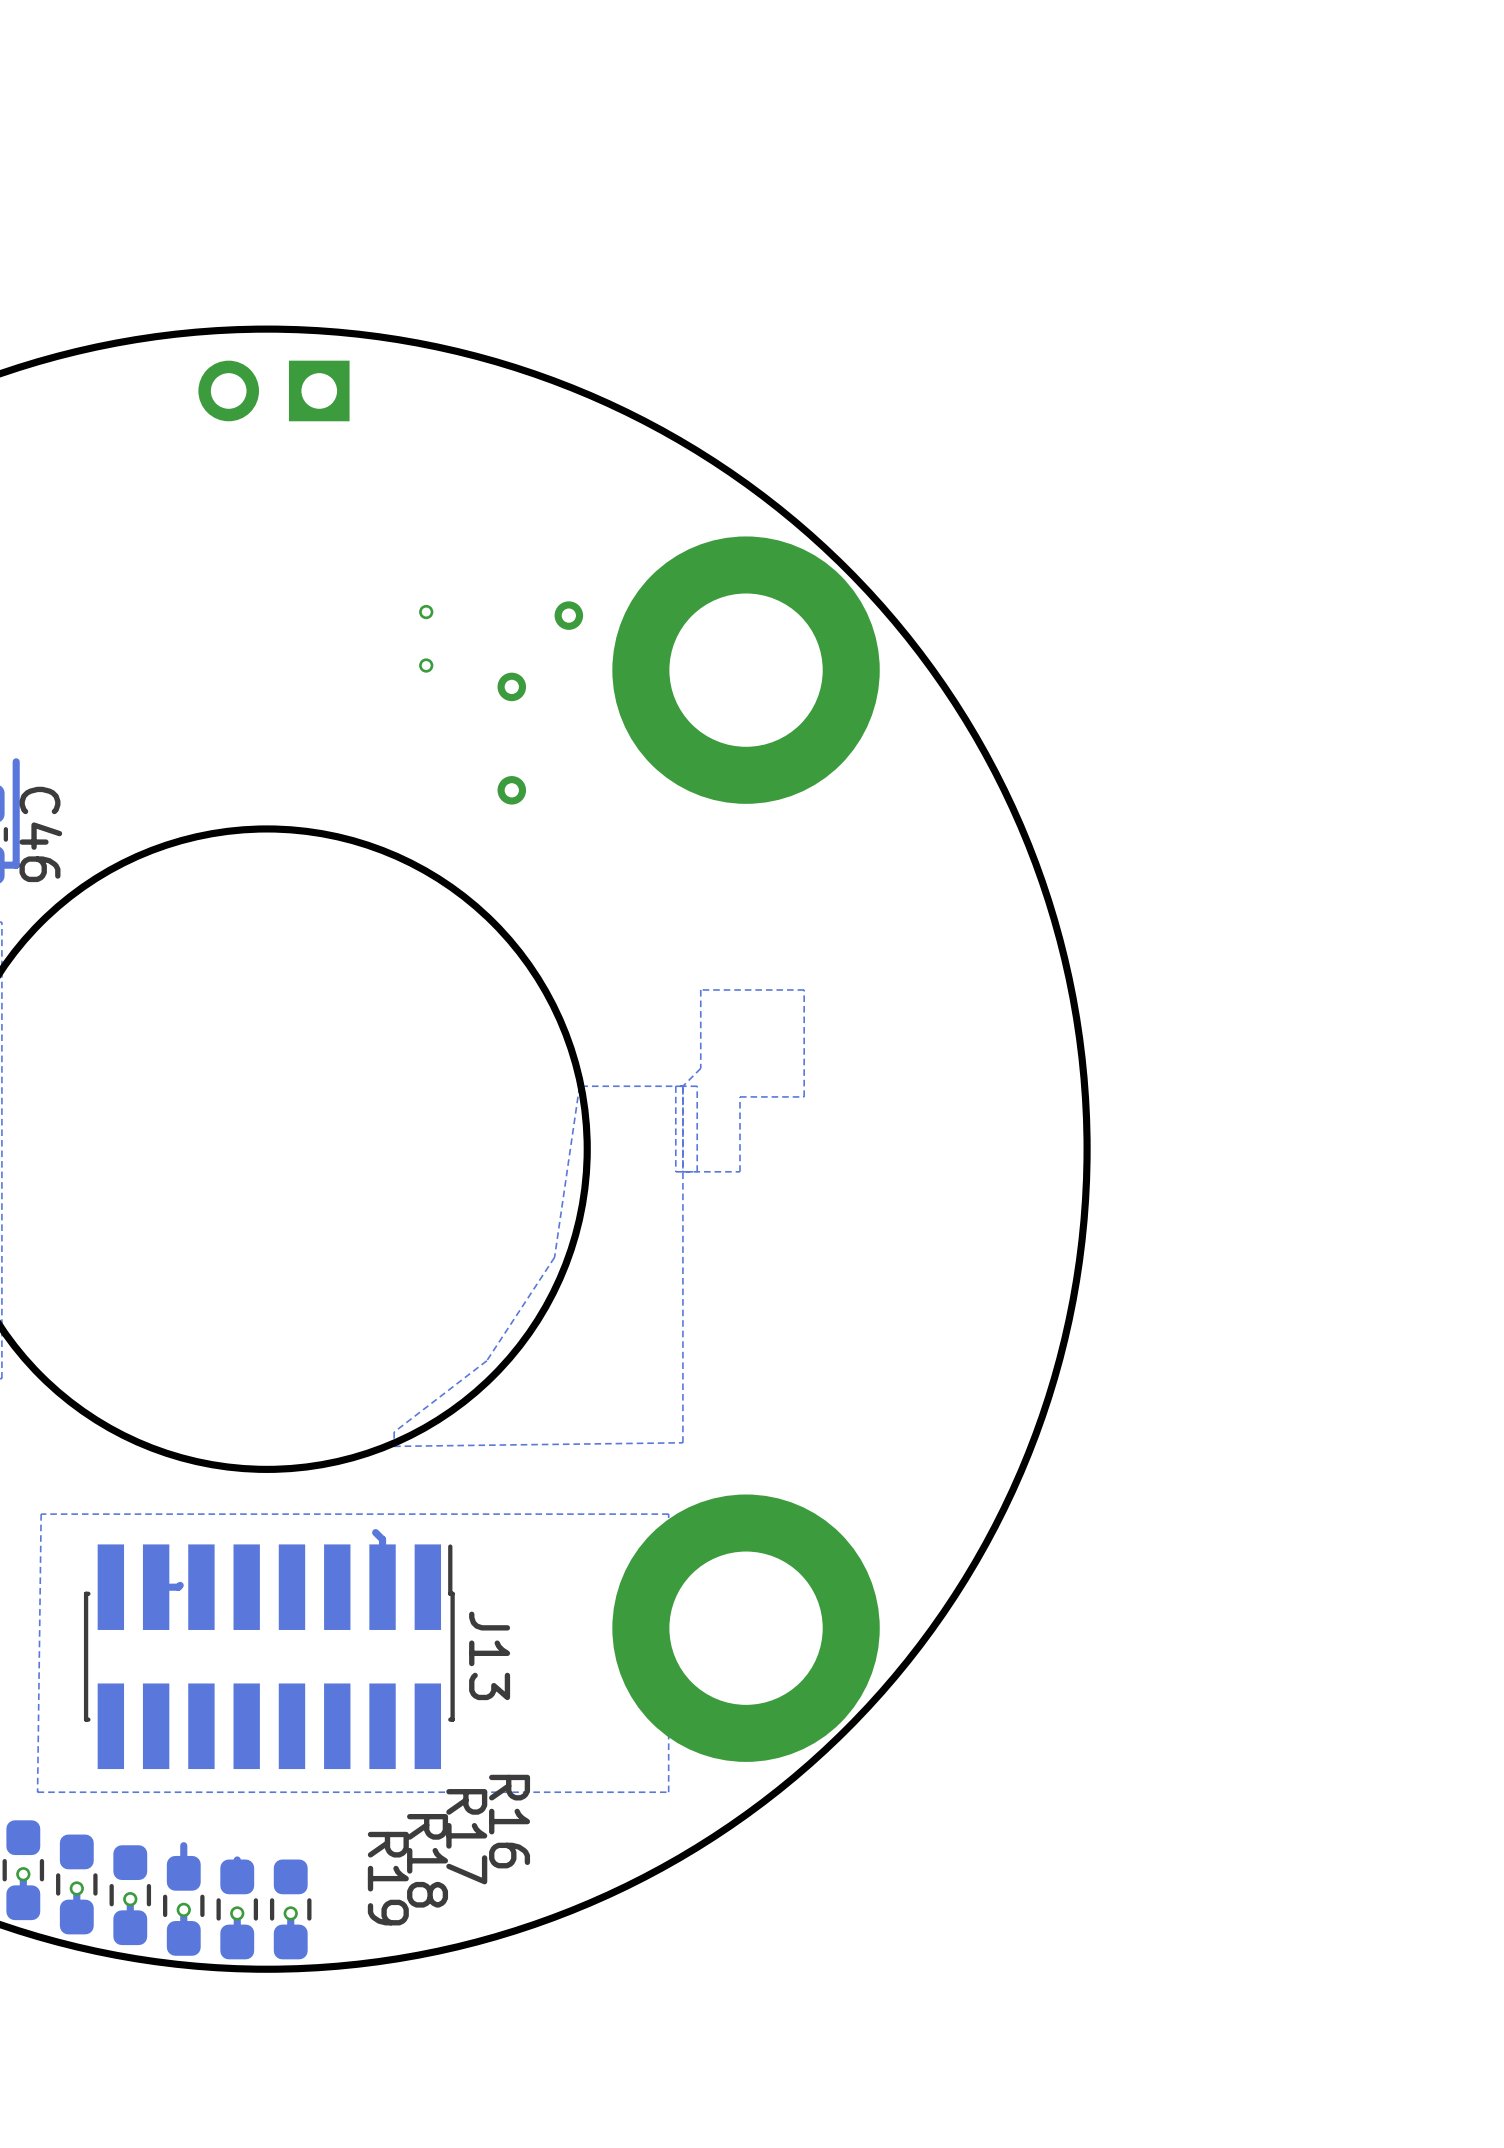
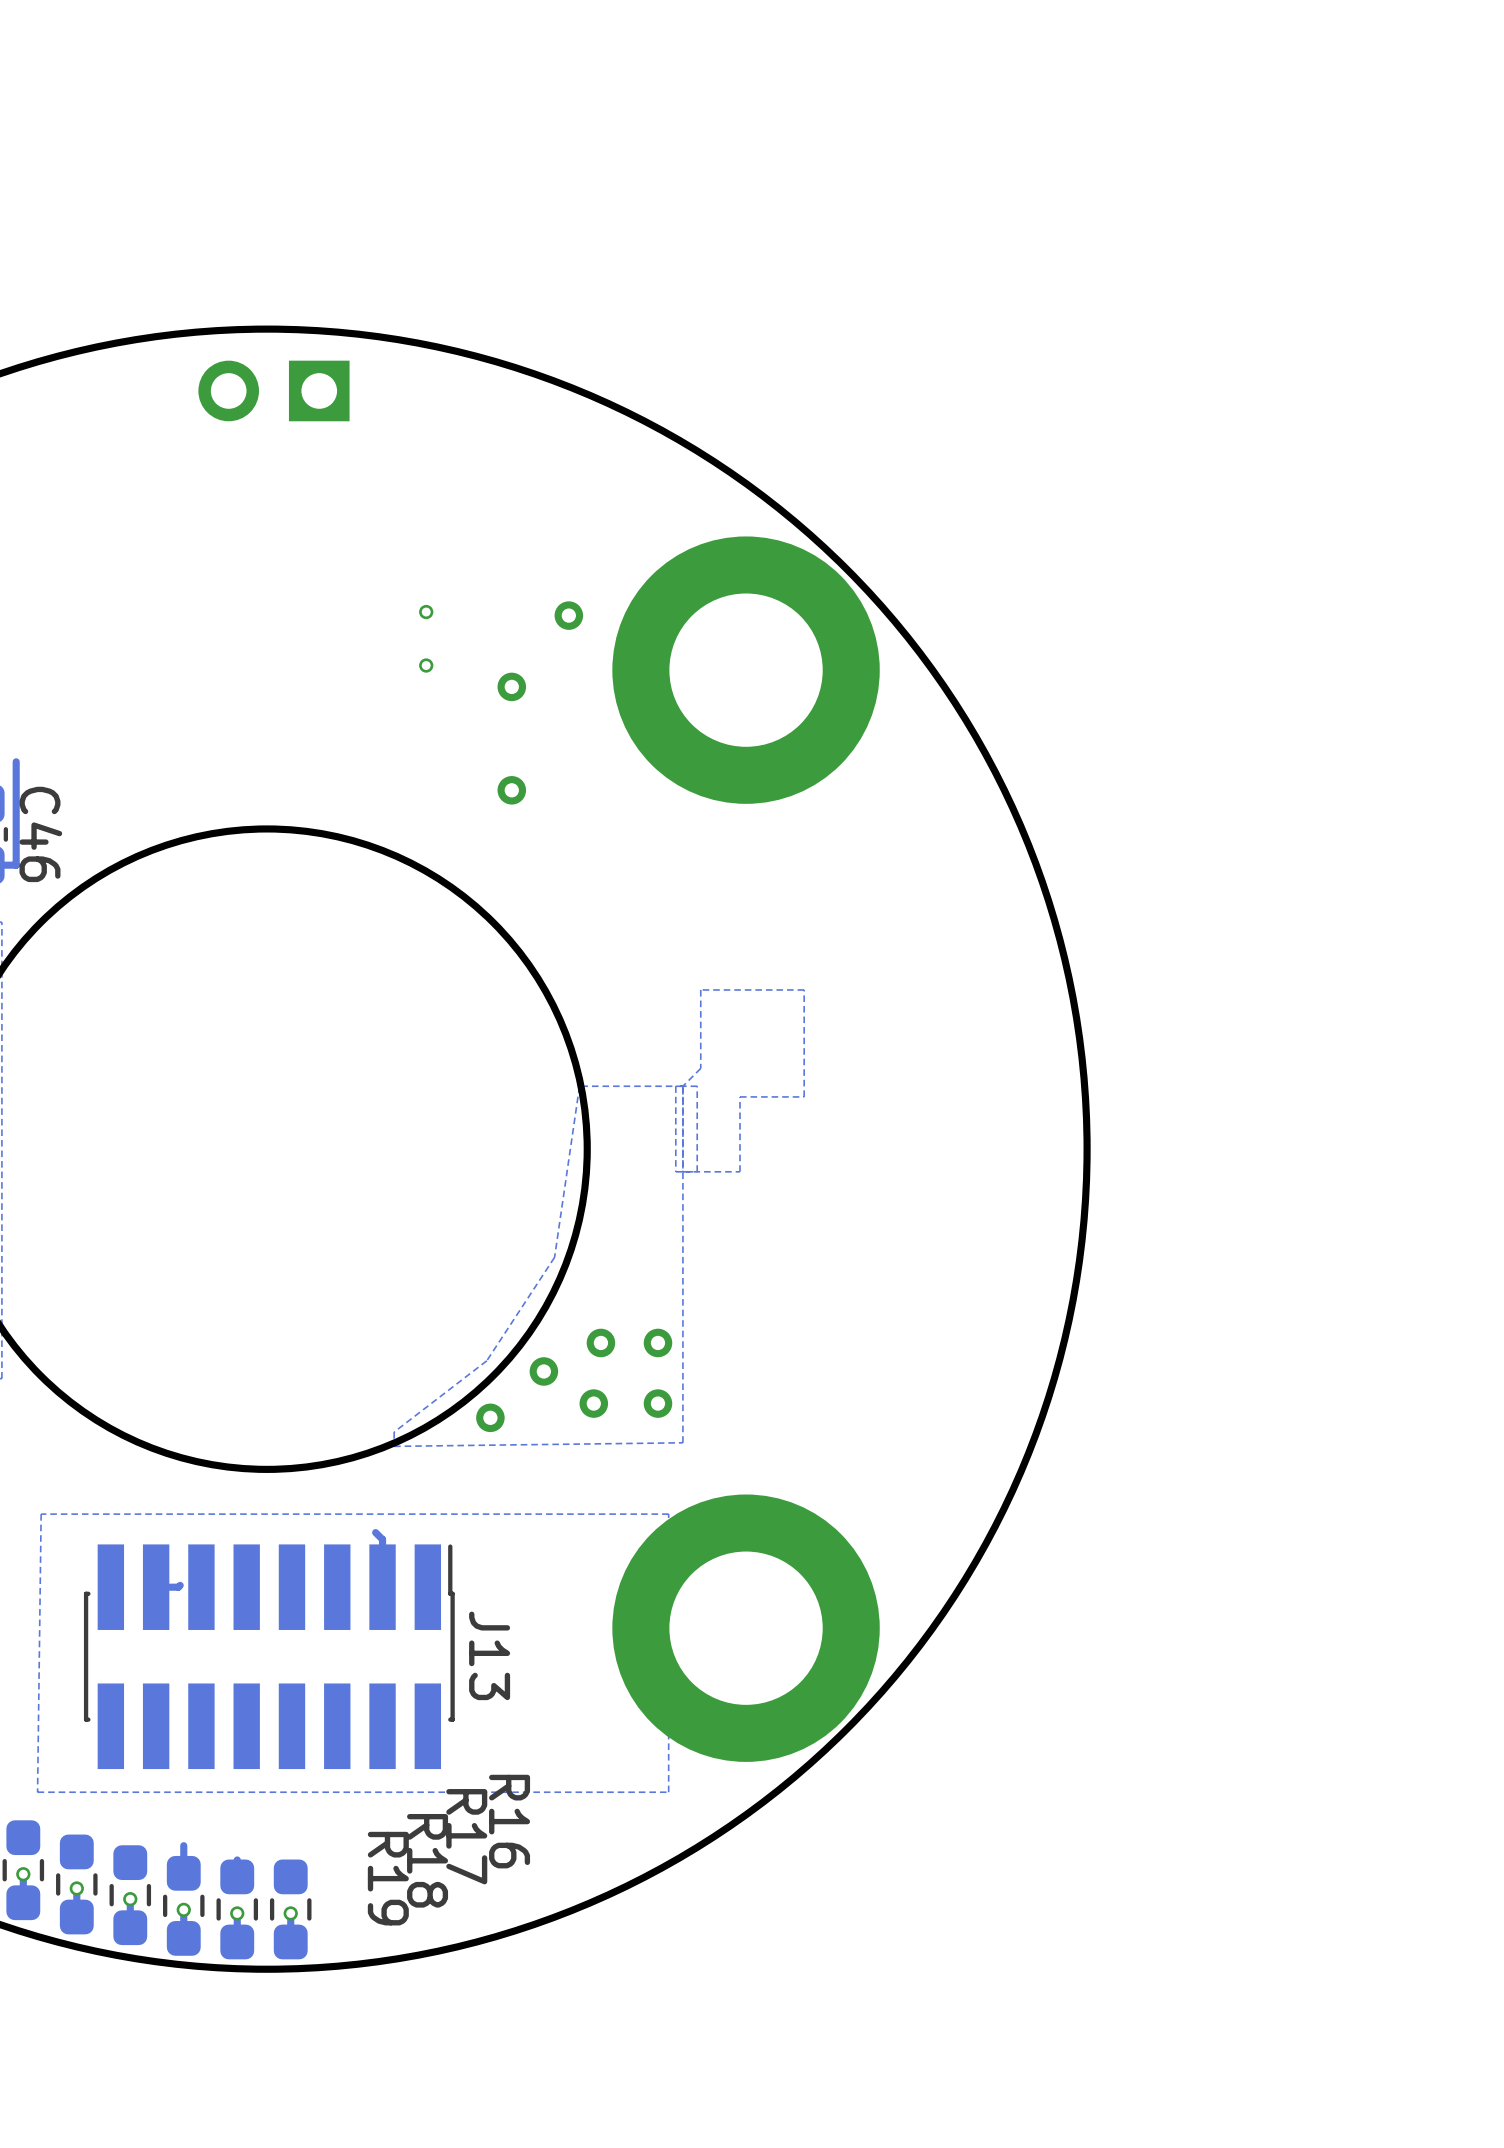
via: none -> (600, 1342)
via: none -> (657, 1342)
via: none -> (543, 1371)
via: none -> (593, 1403)
via: none -> (657, 1403)
via: none -> (490, 1417)

